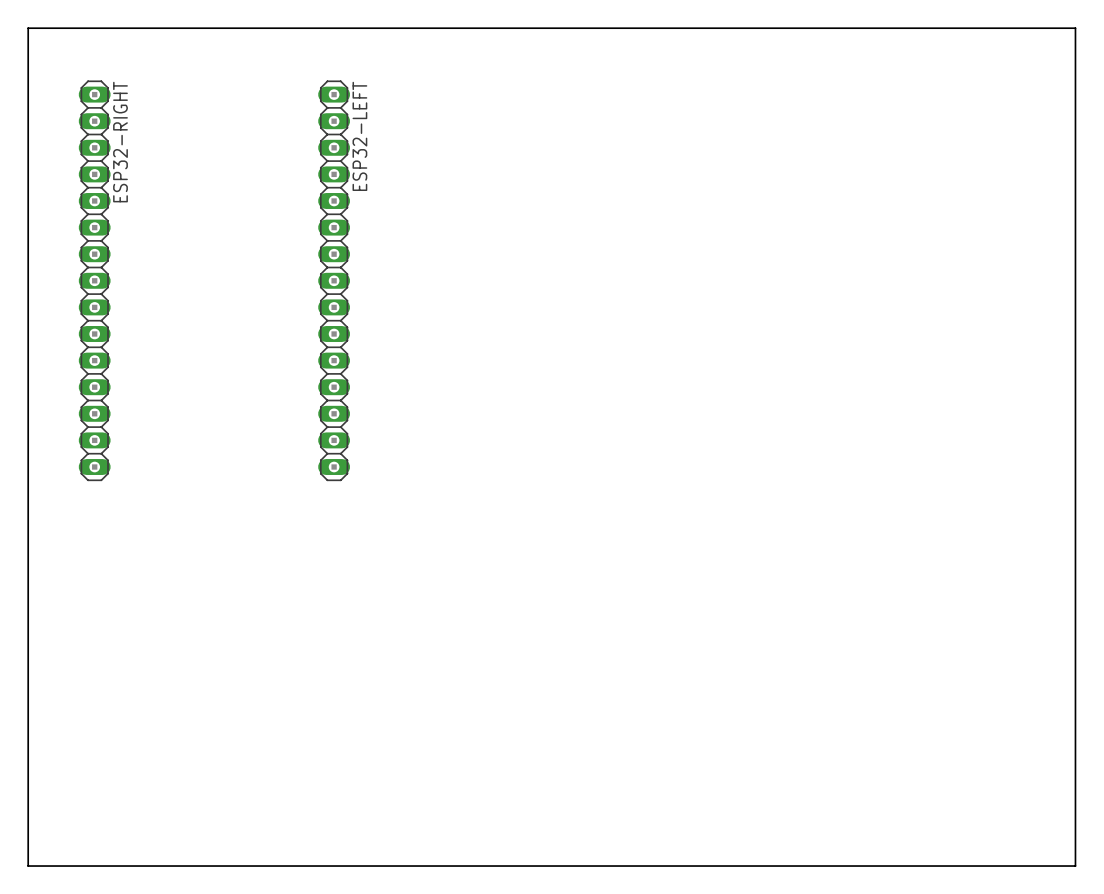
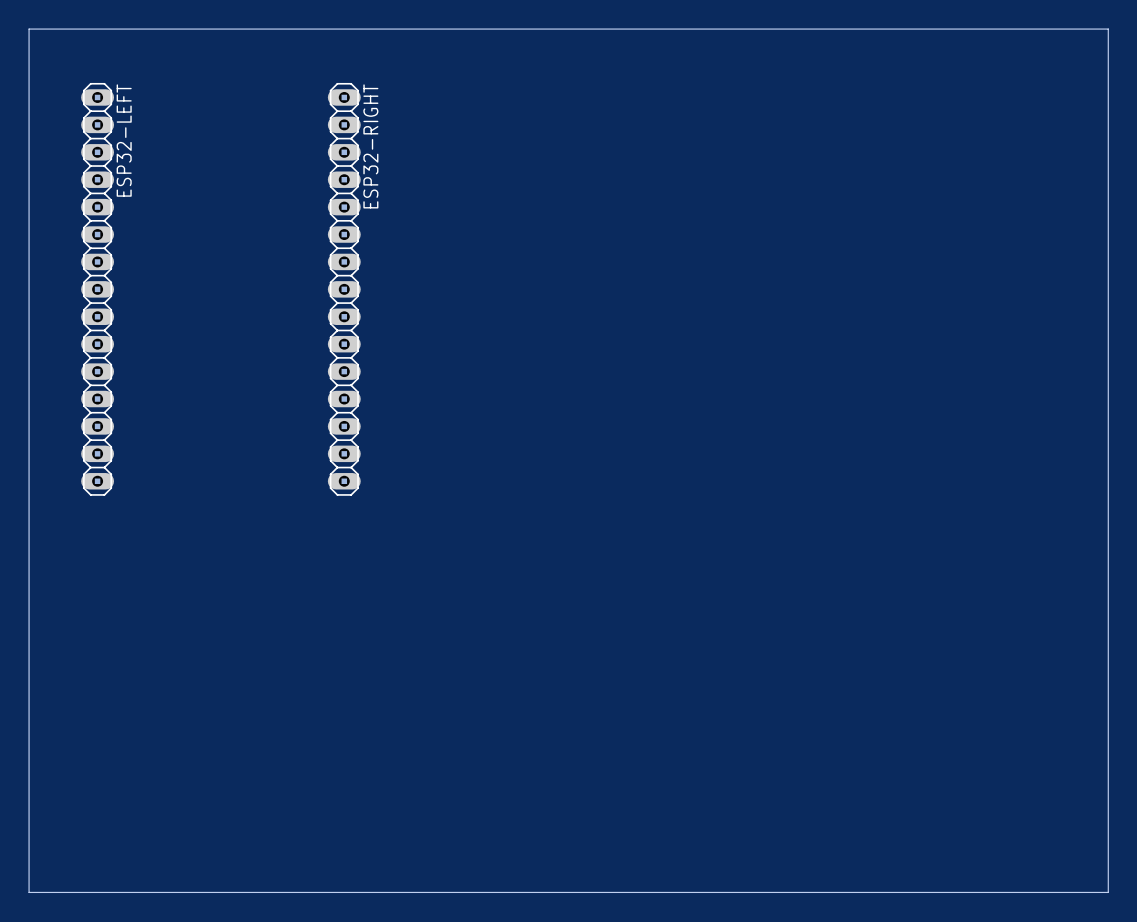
ESP32-LEFT name: ESP32-LEFT (359, 136) -> ESP32-RIGHT (370, 146)
ESP32-RIGHT name: ESP32-RIGHT (120, 142) -> ESP32-LEFT (124, 140)

